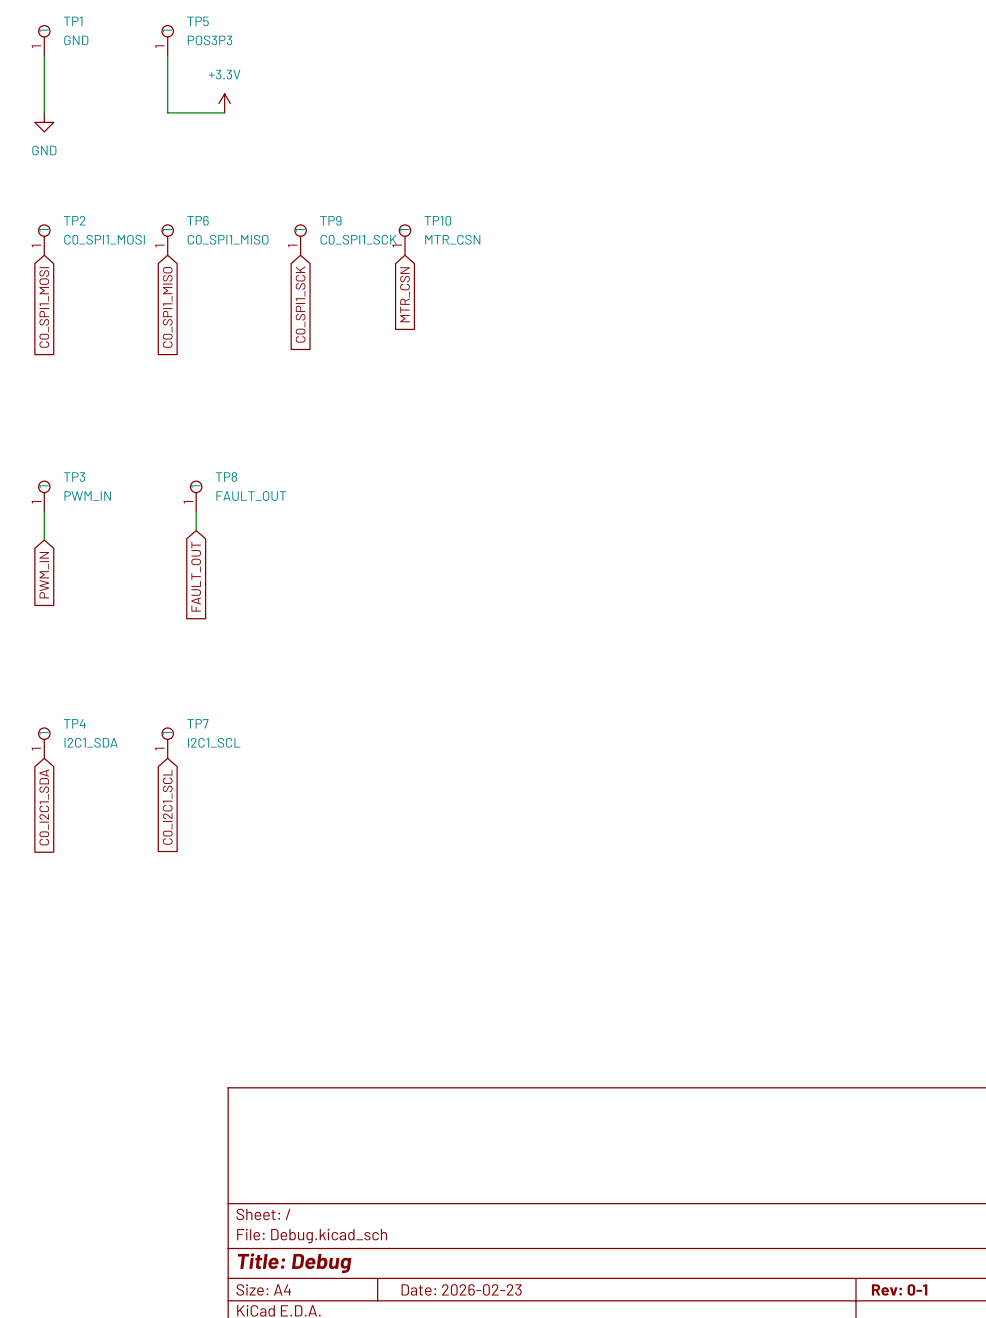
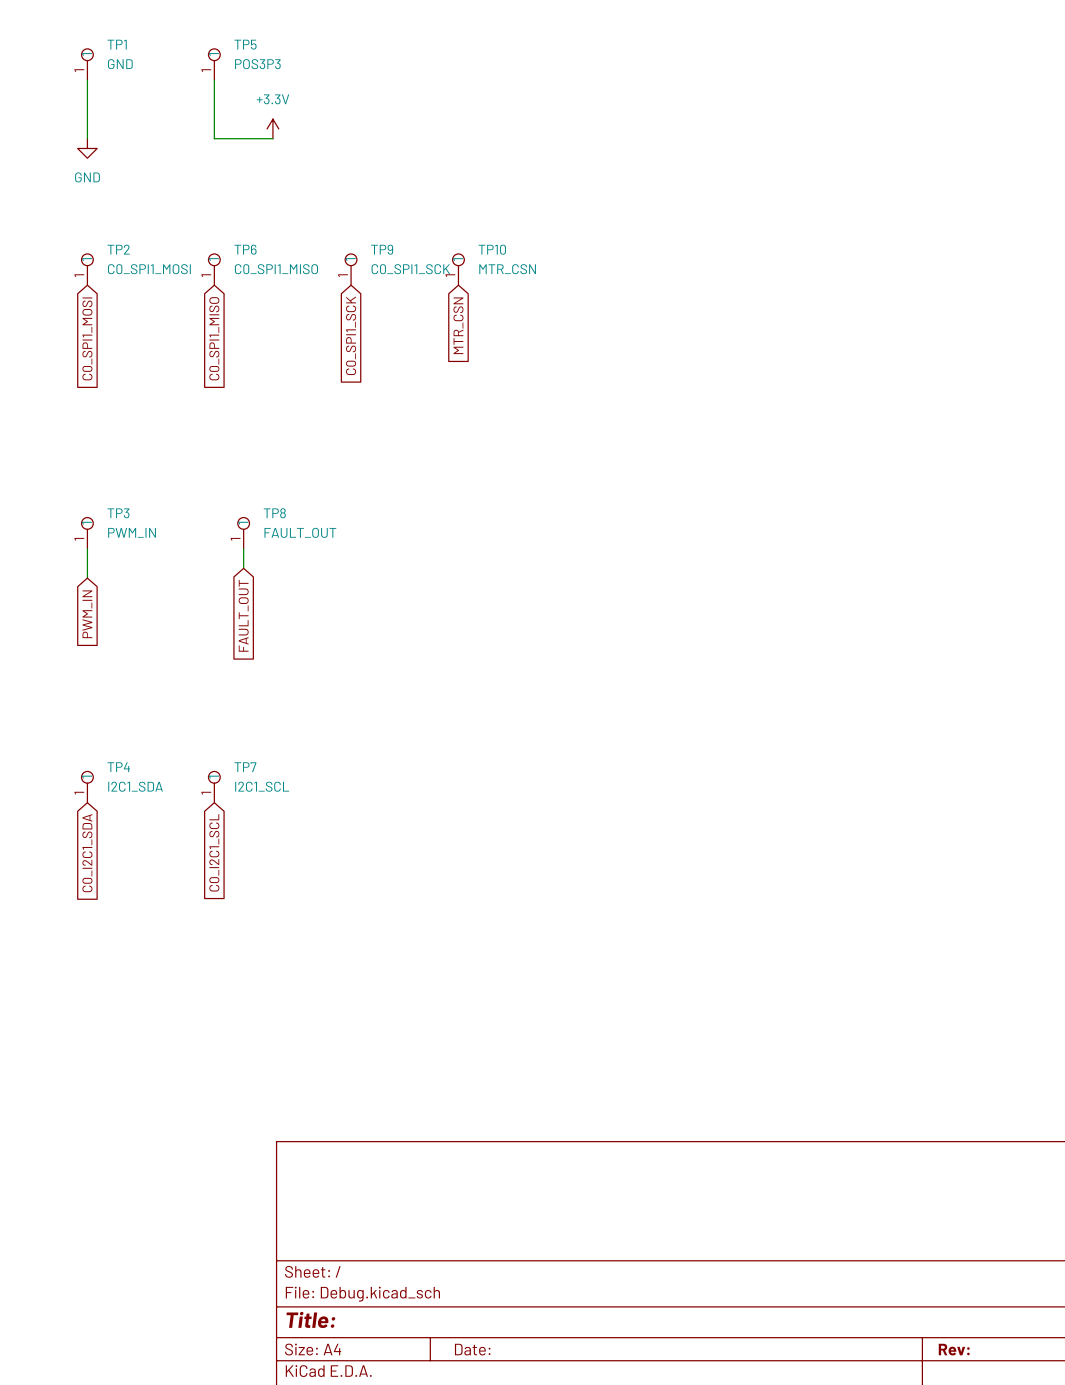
title block: Title: Debug (294, 1263) -> Title: (310, 1319)
title block: Date: 2026-02-23 (461, 1289) -> Date: (472, 1349)
title block: Rev: 0-1 (899, 1289) -> Rev: (954, 1349)

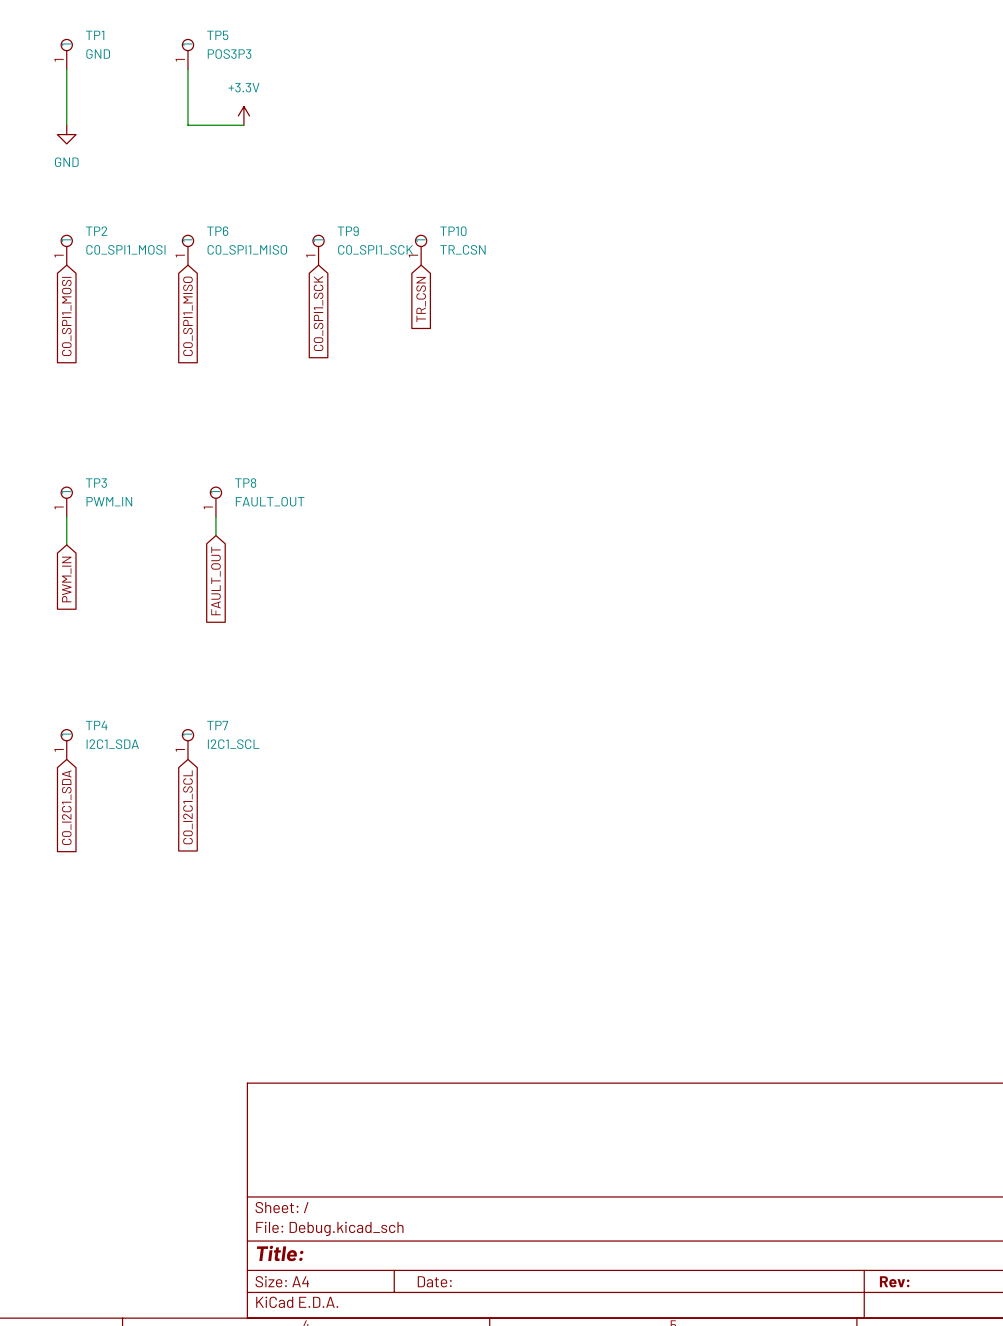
TP10 value: MTR_CSN (507, 269) -> TR_CSN (462, 249)
global label: MTR_CSN (458, 325) -> TR_CSN (421, 299)

